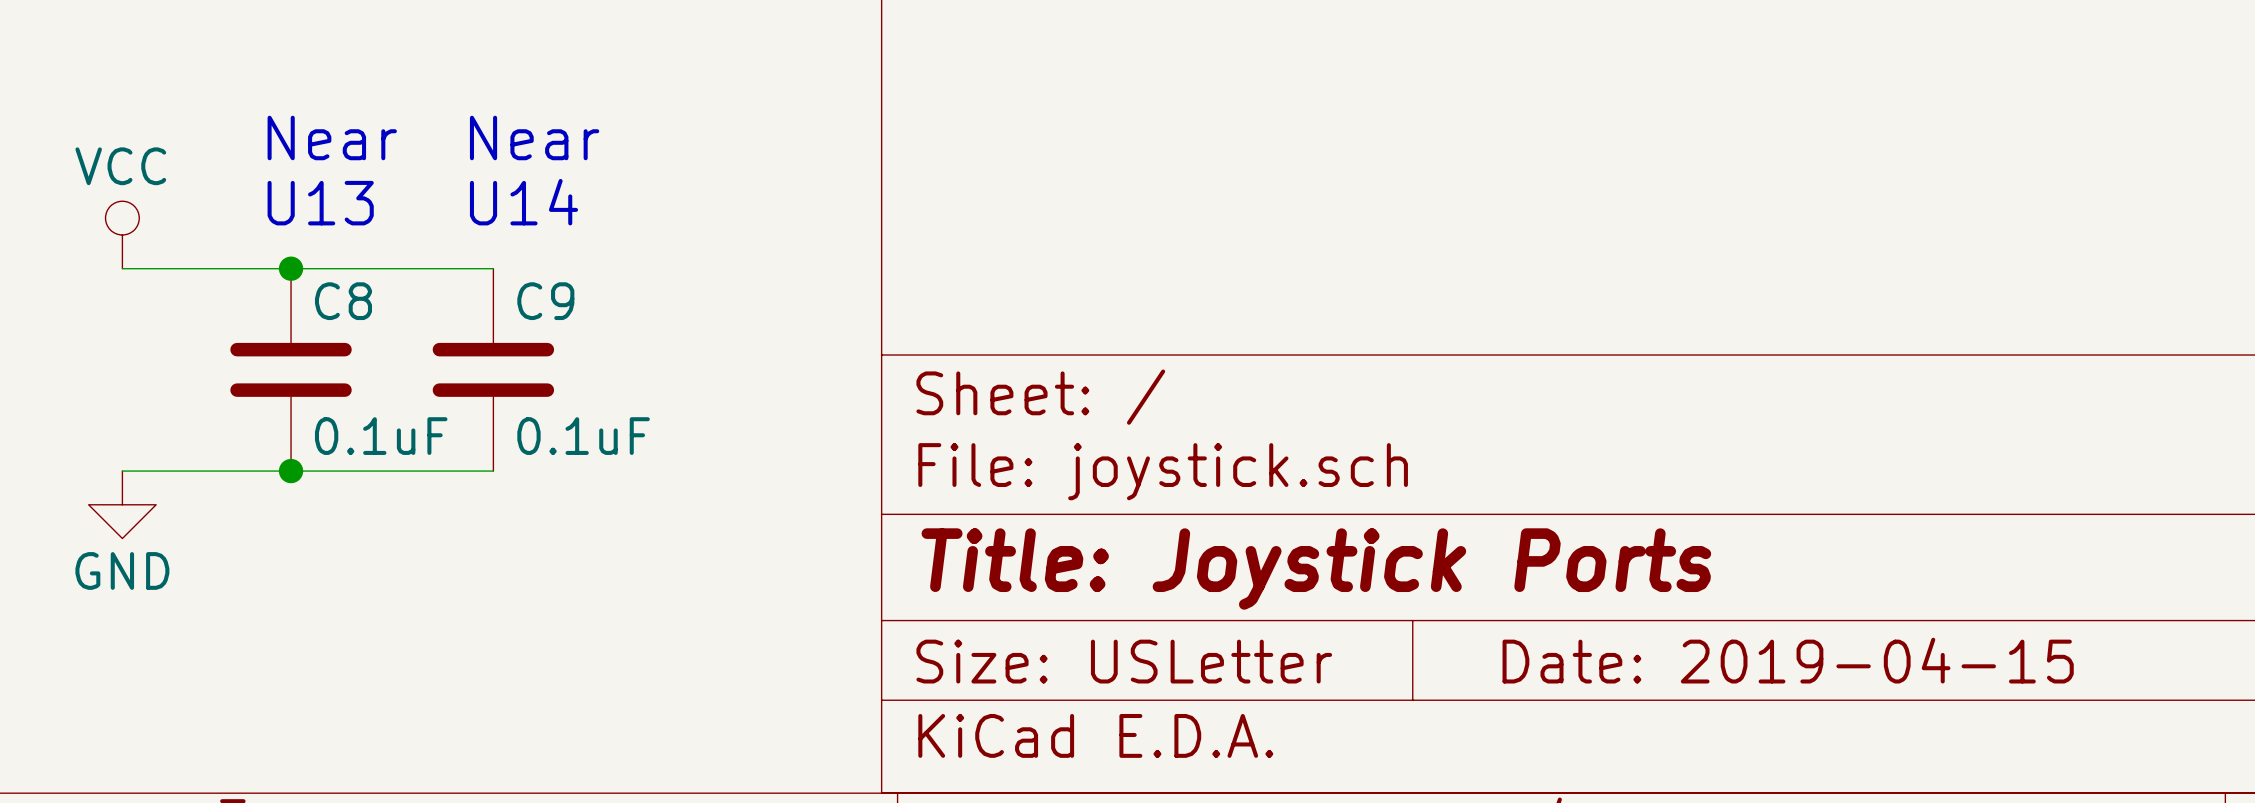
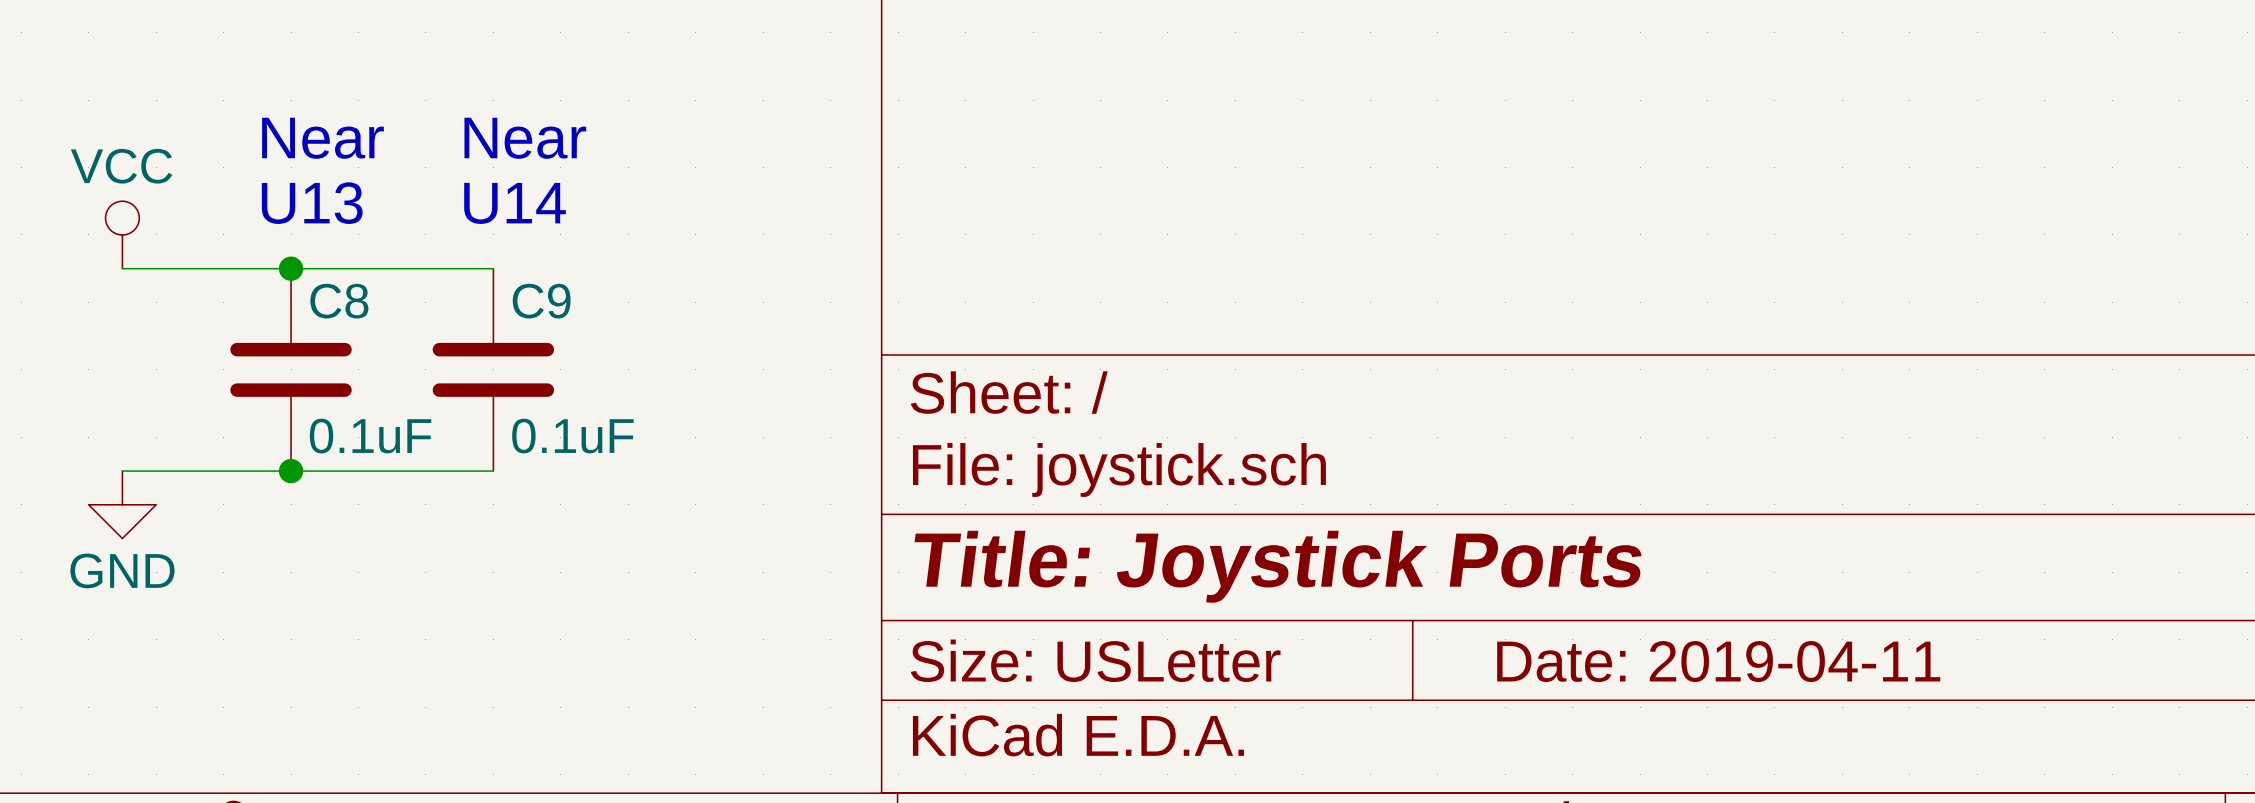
title block: Date: 2019-04-15 (1788, 660) -> Date: 2019-04-11 (1718, 661)

